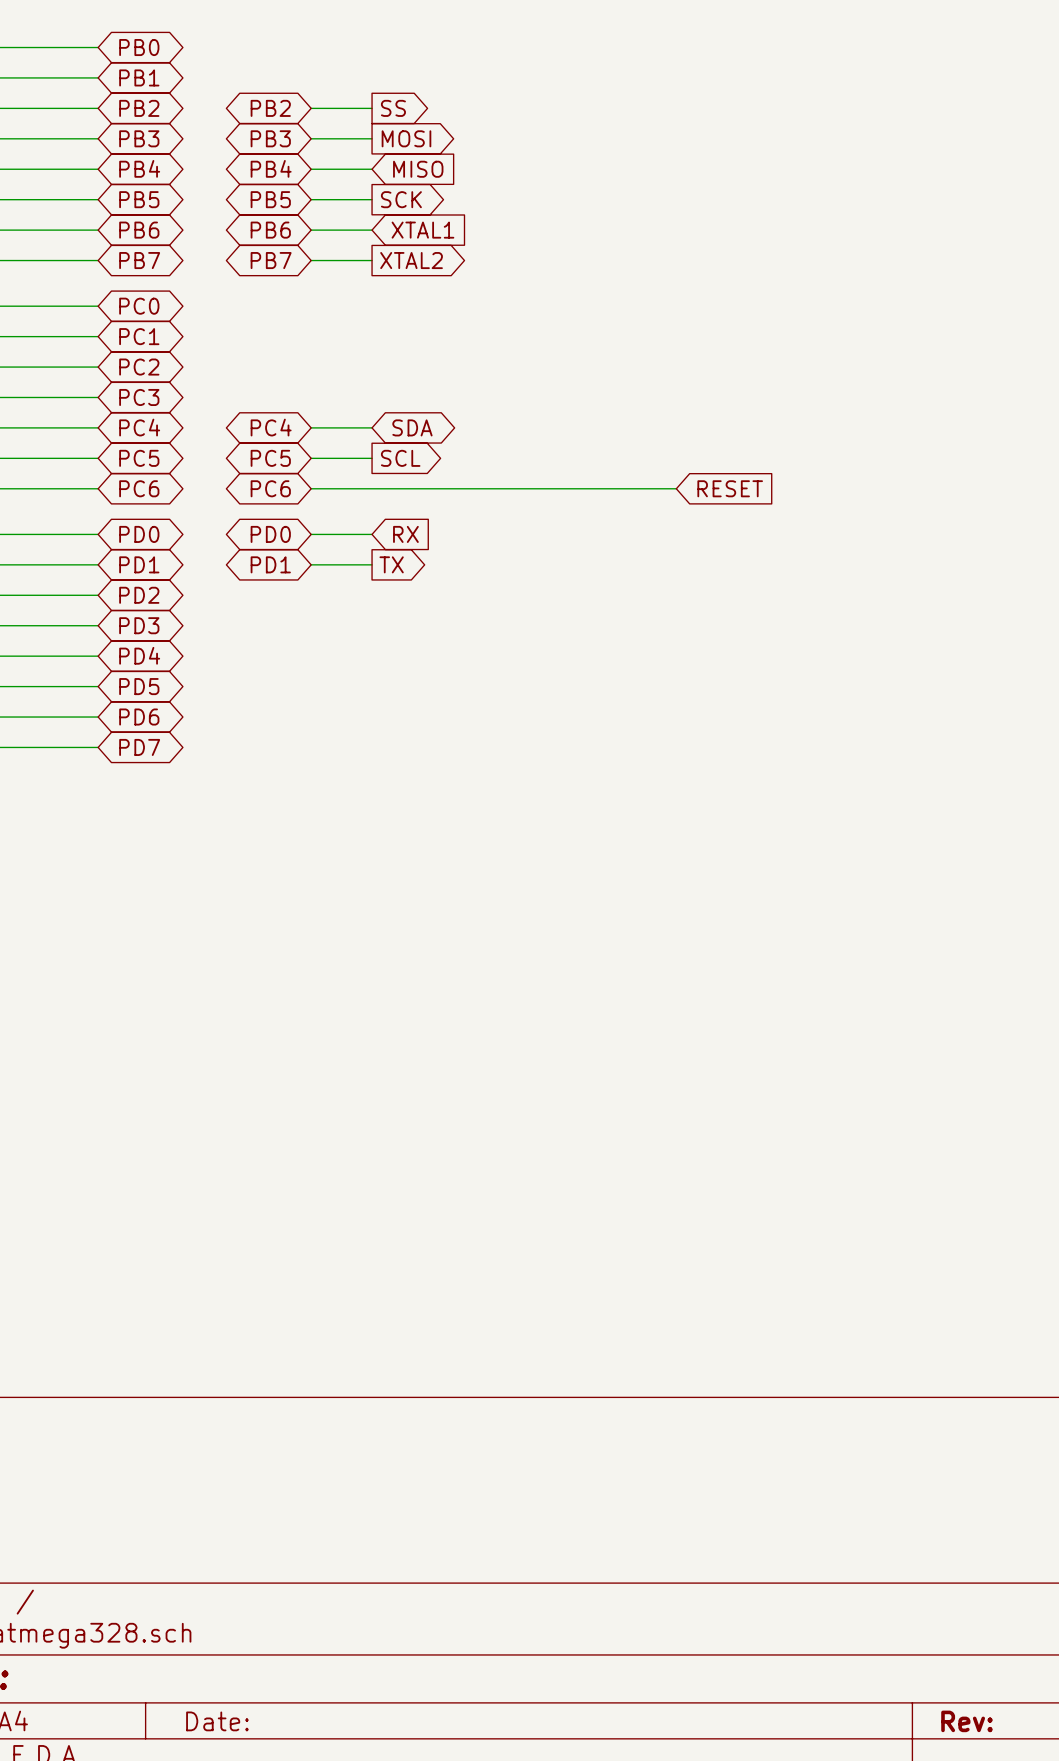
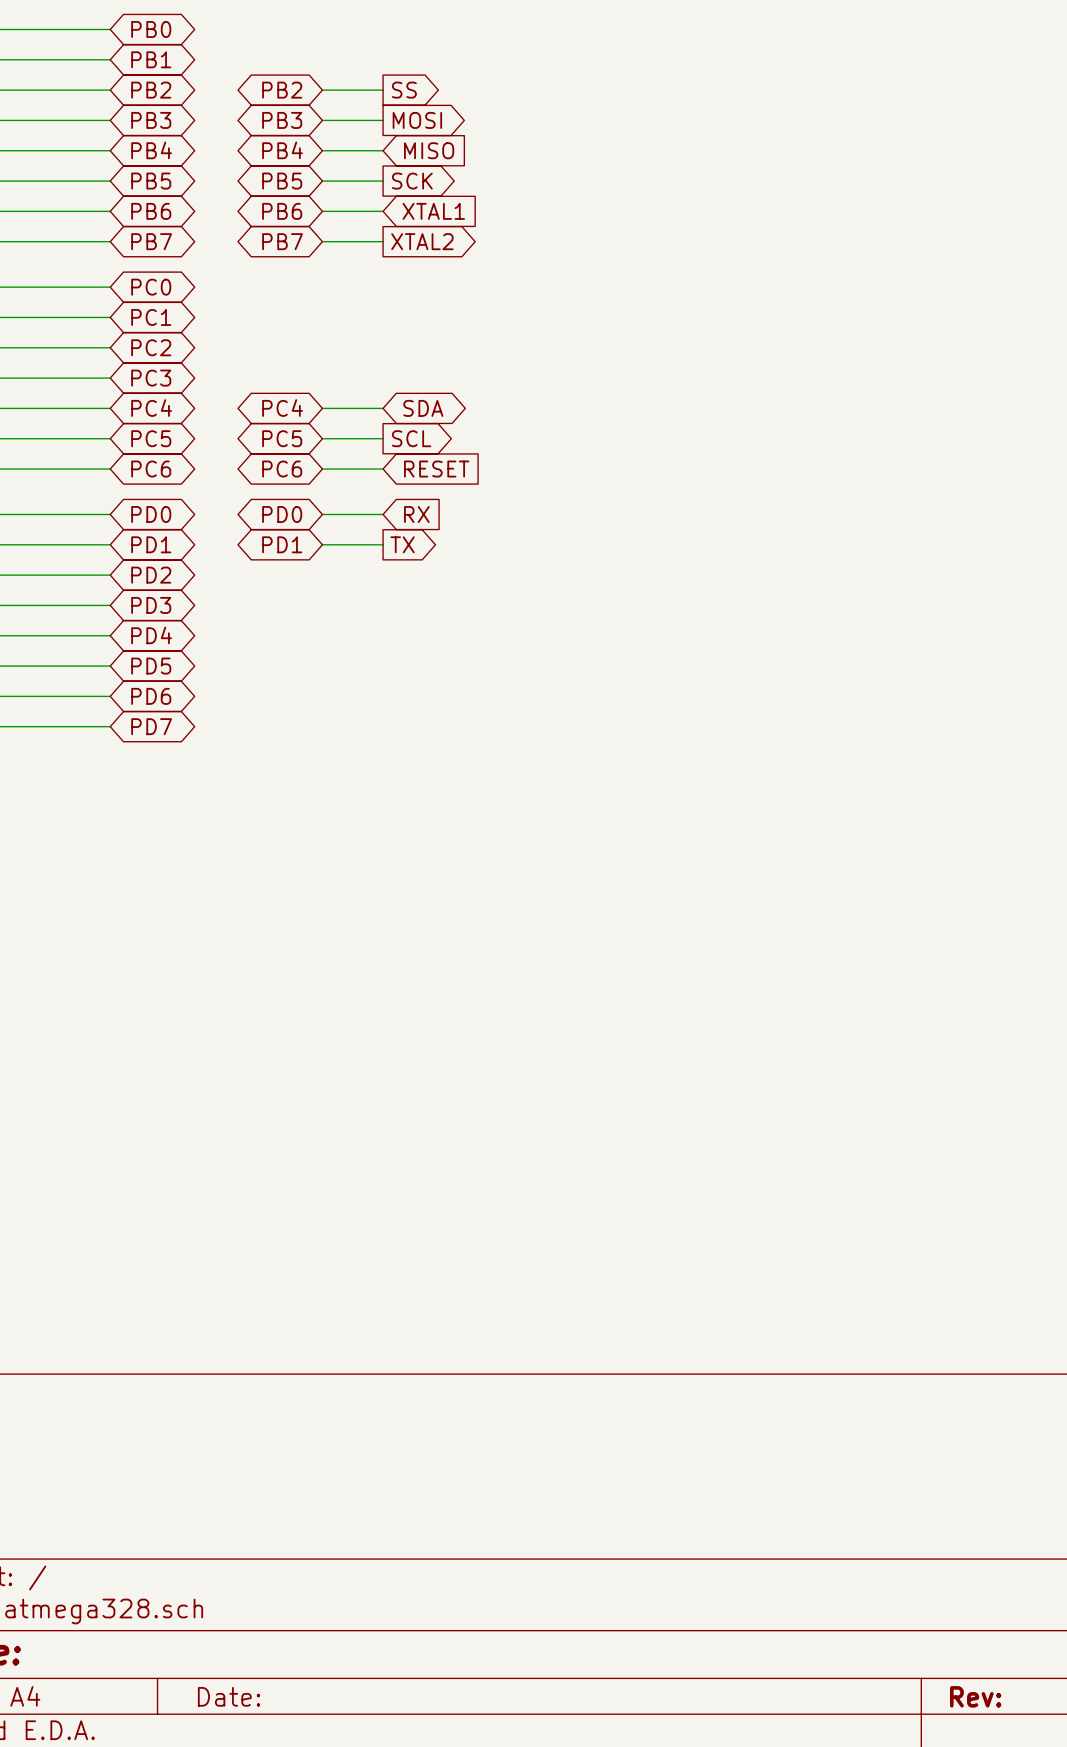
wire: (372, 488) (676, 488) -> none
global label: none -> RESET (436, 469)
global label: RESET (730, 488) -> none

